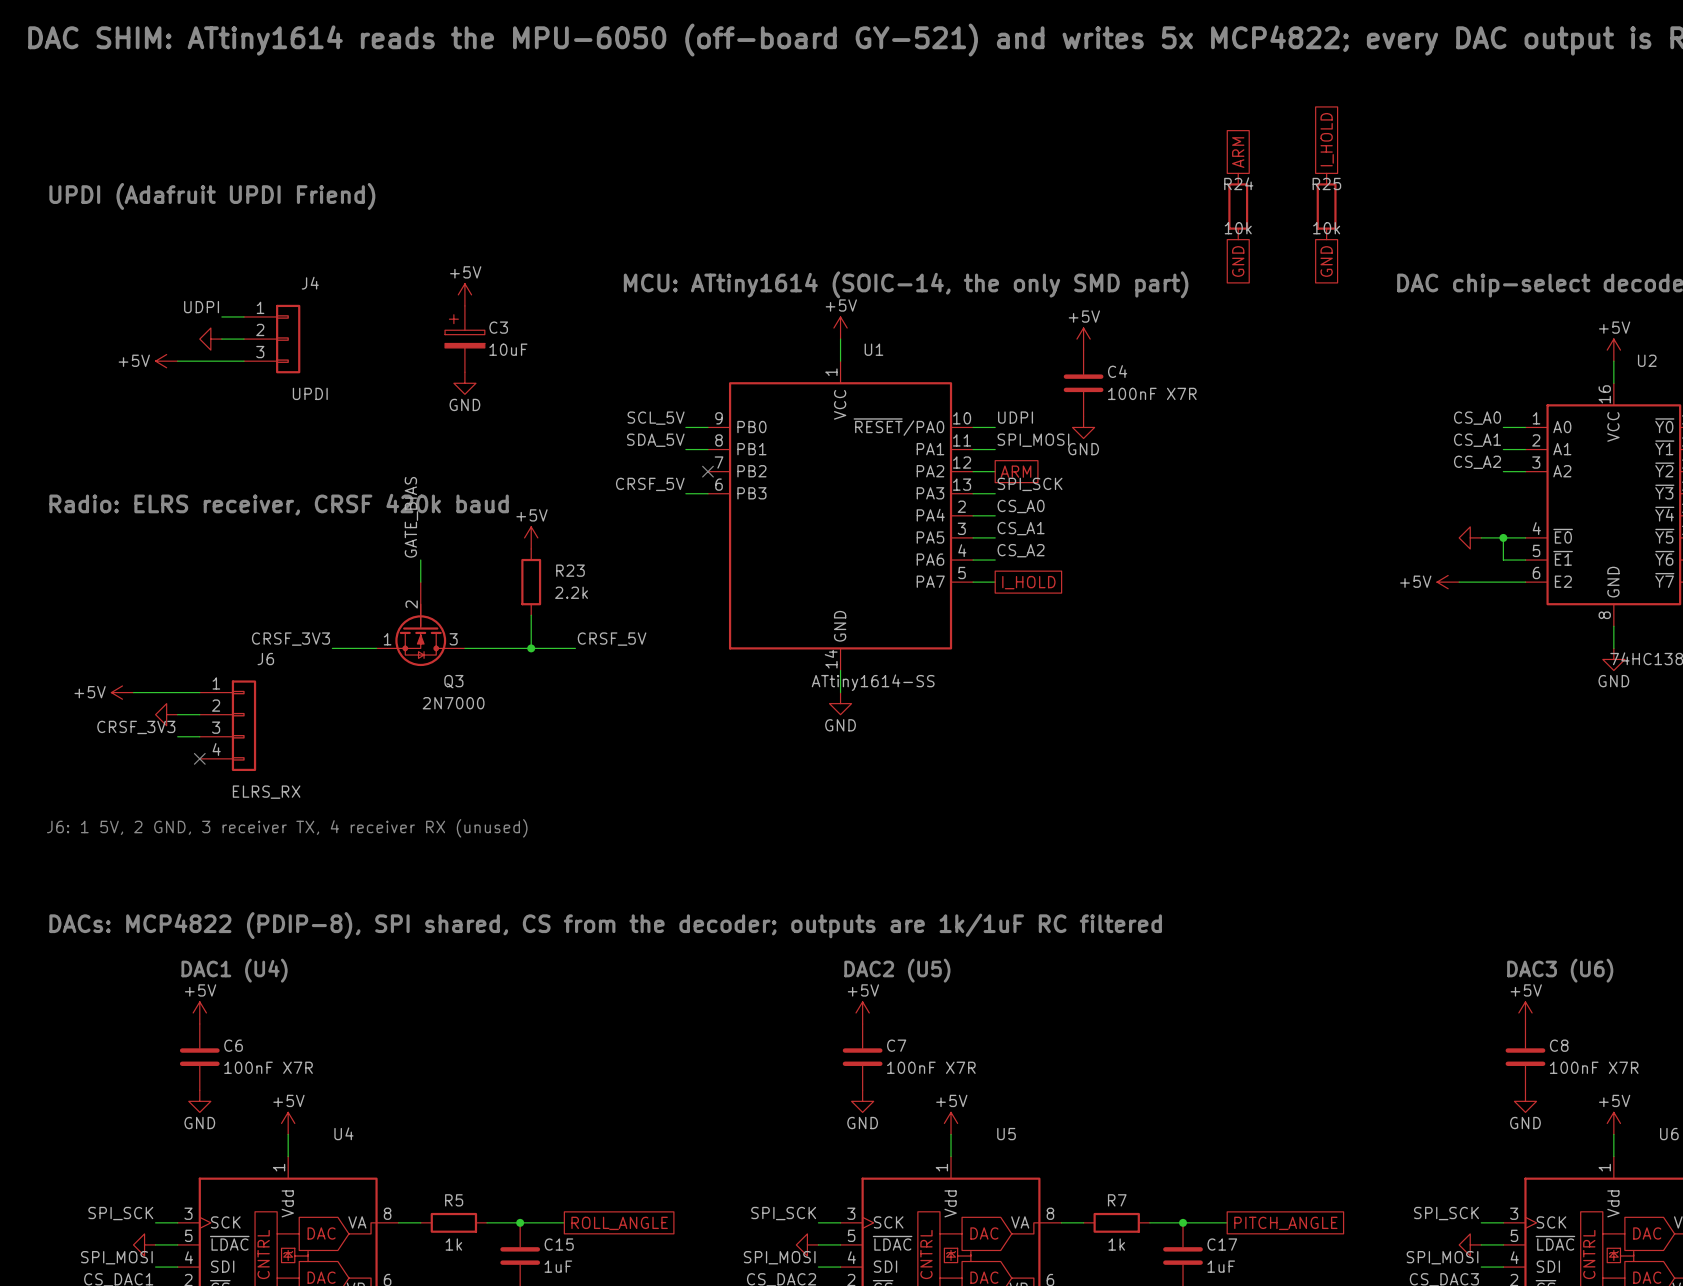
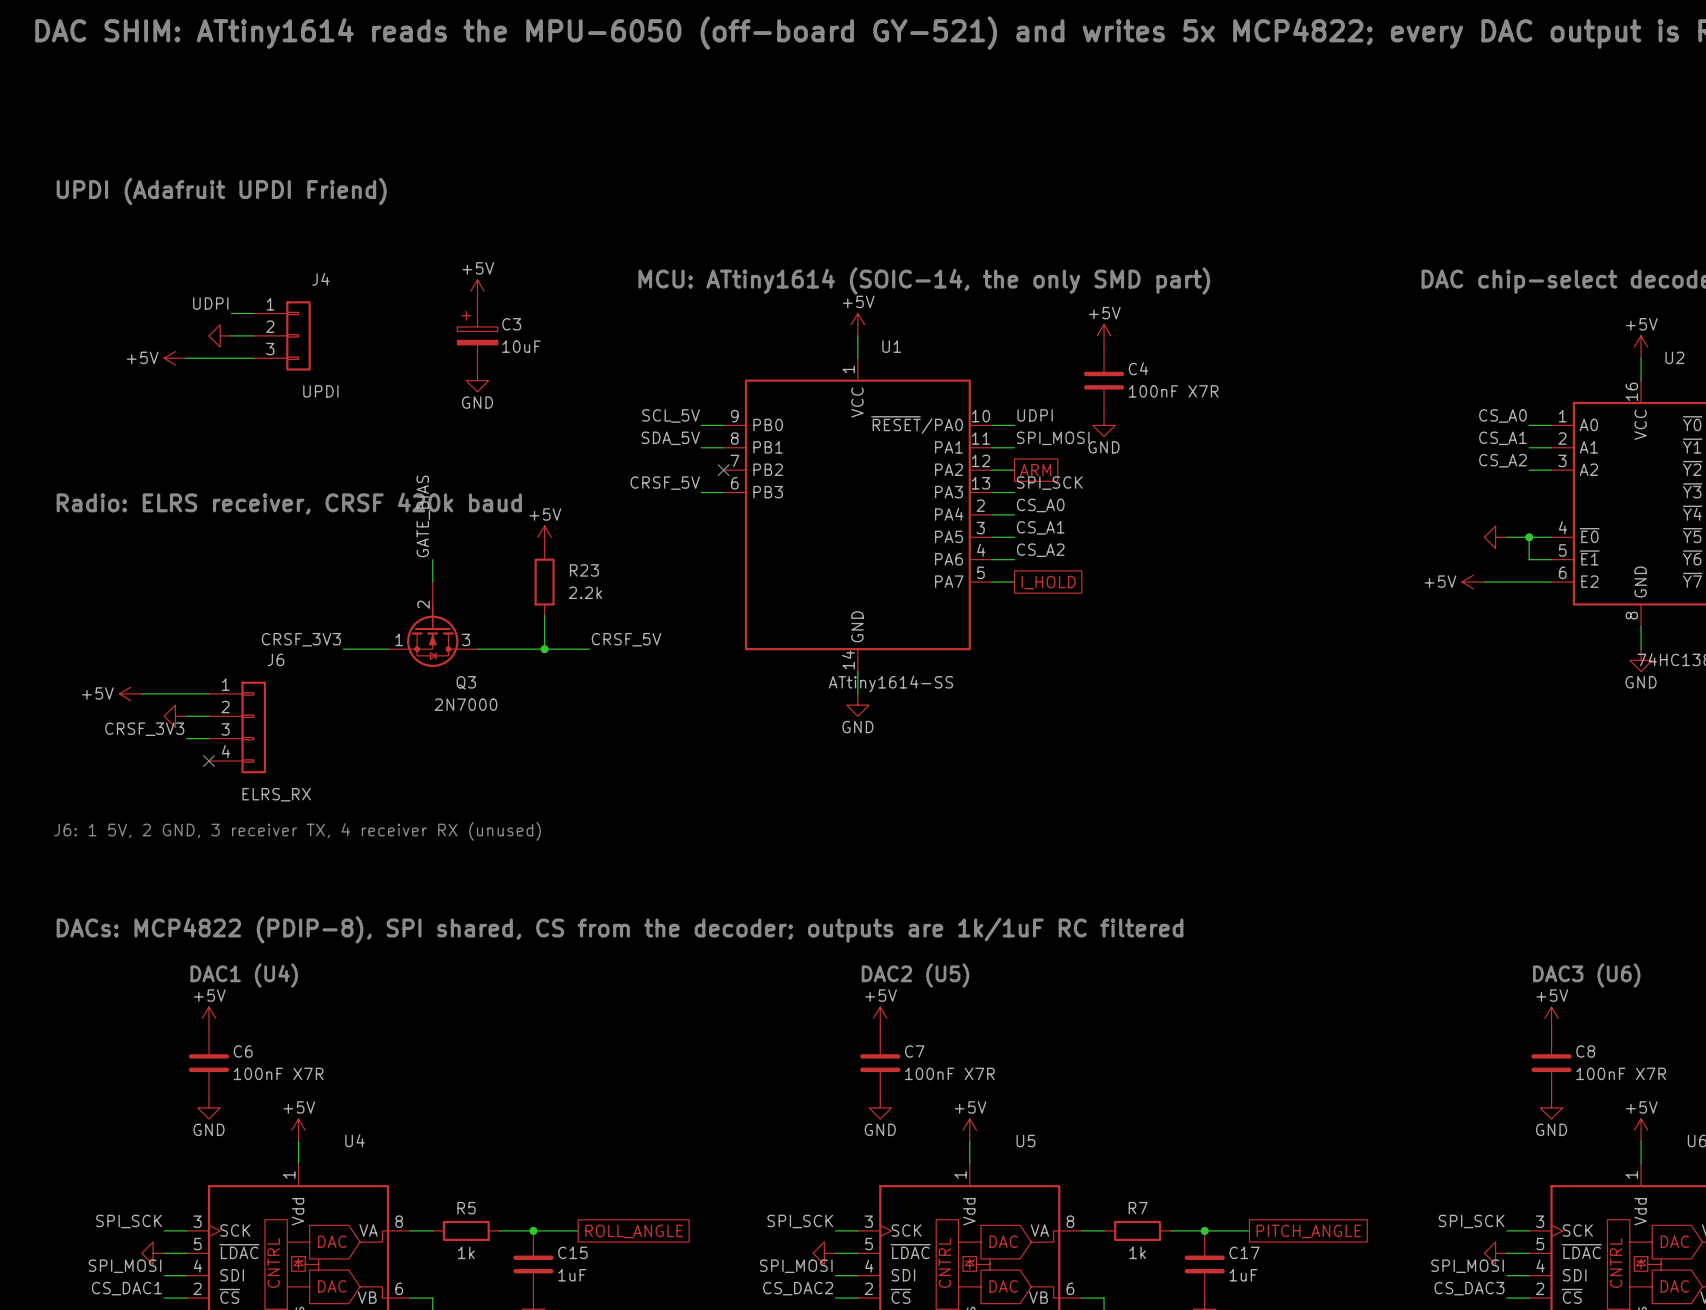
global label: I_HOLD (1327, 139) -> none
global label: ARM (1238, 152) -> none
R24: 10k (1238, 206) -> none
R25: 10k (1326, 206) -> none
global label: GND (1238, 261) -> none
global label: GND (1326, 261) -> none

